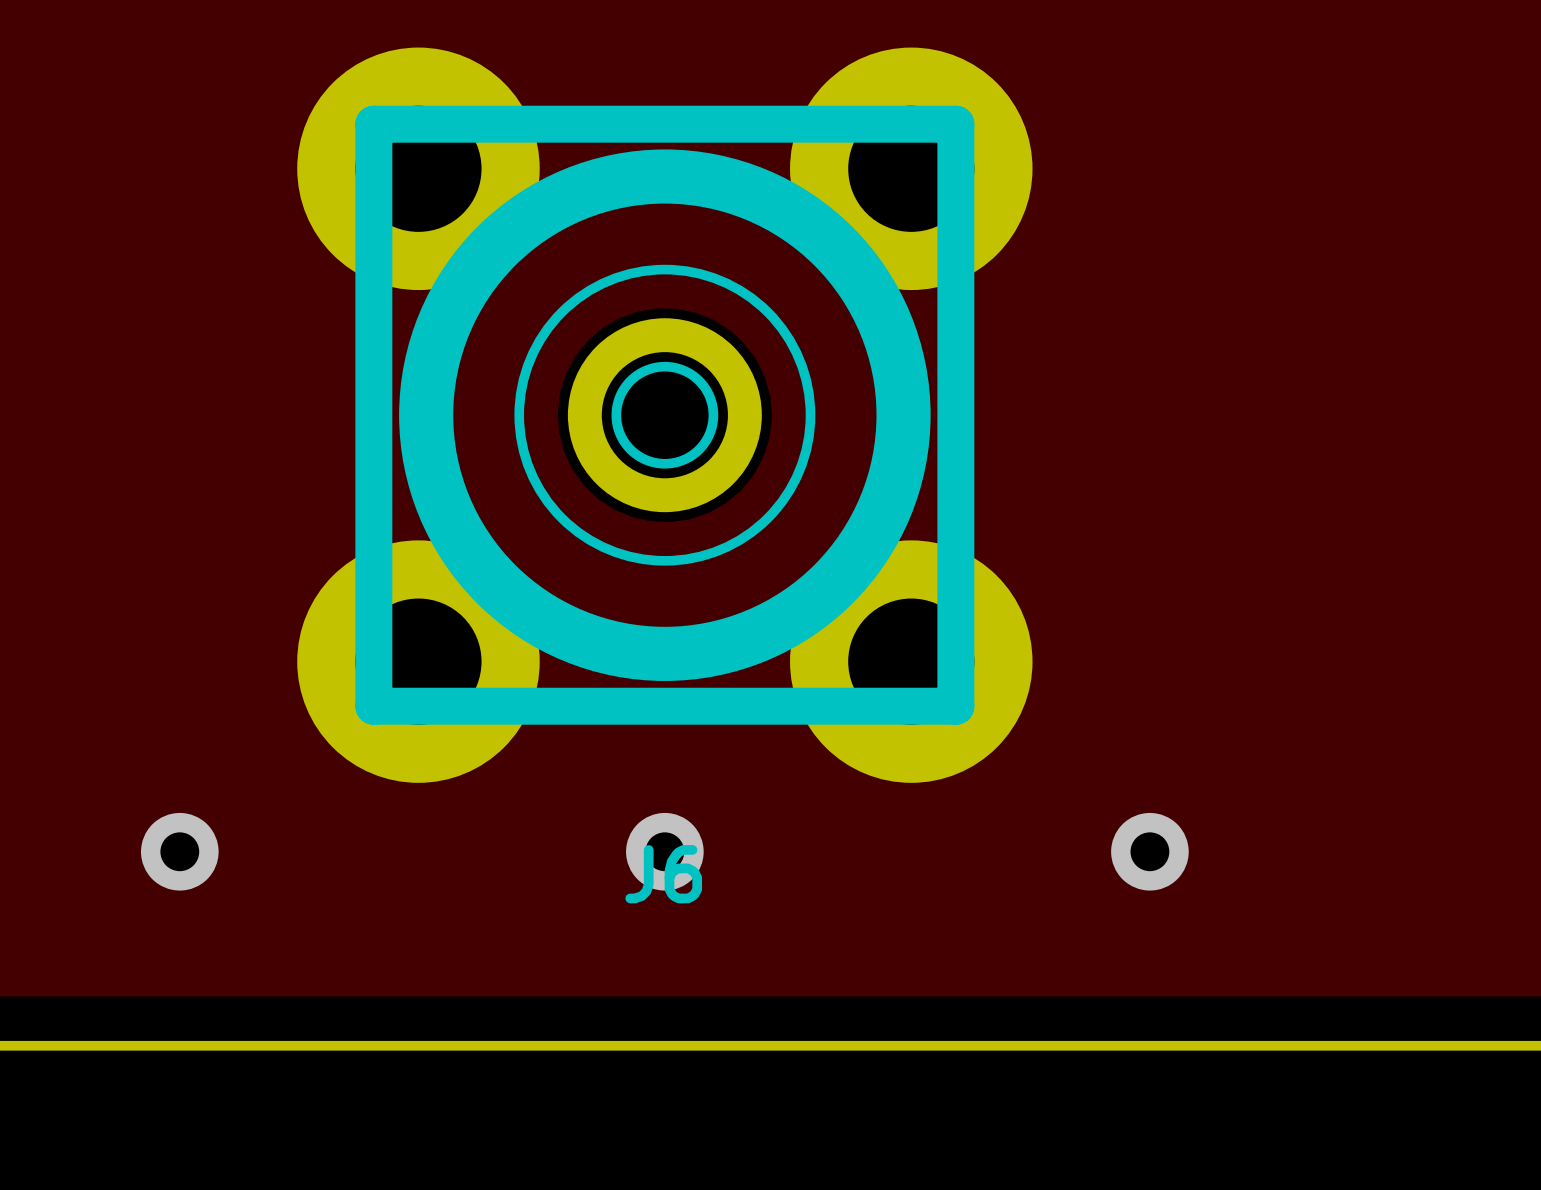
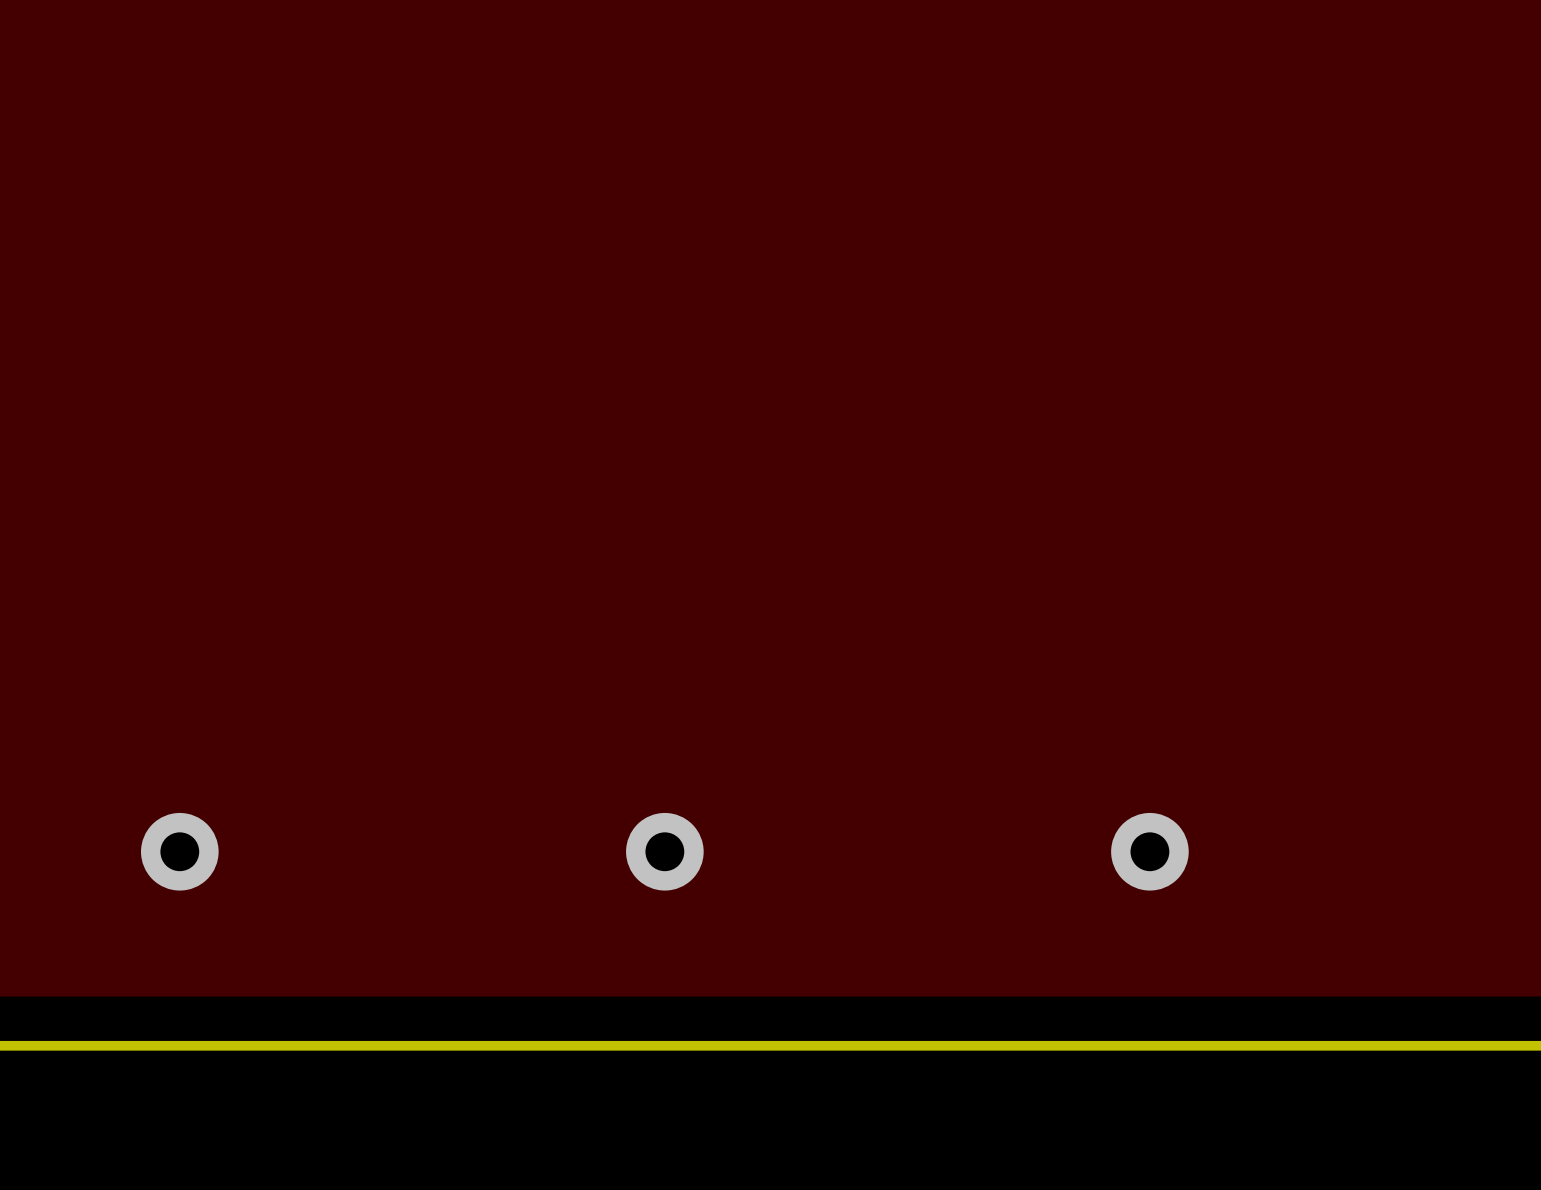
J6: (664, 415) -> none

